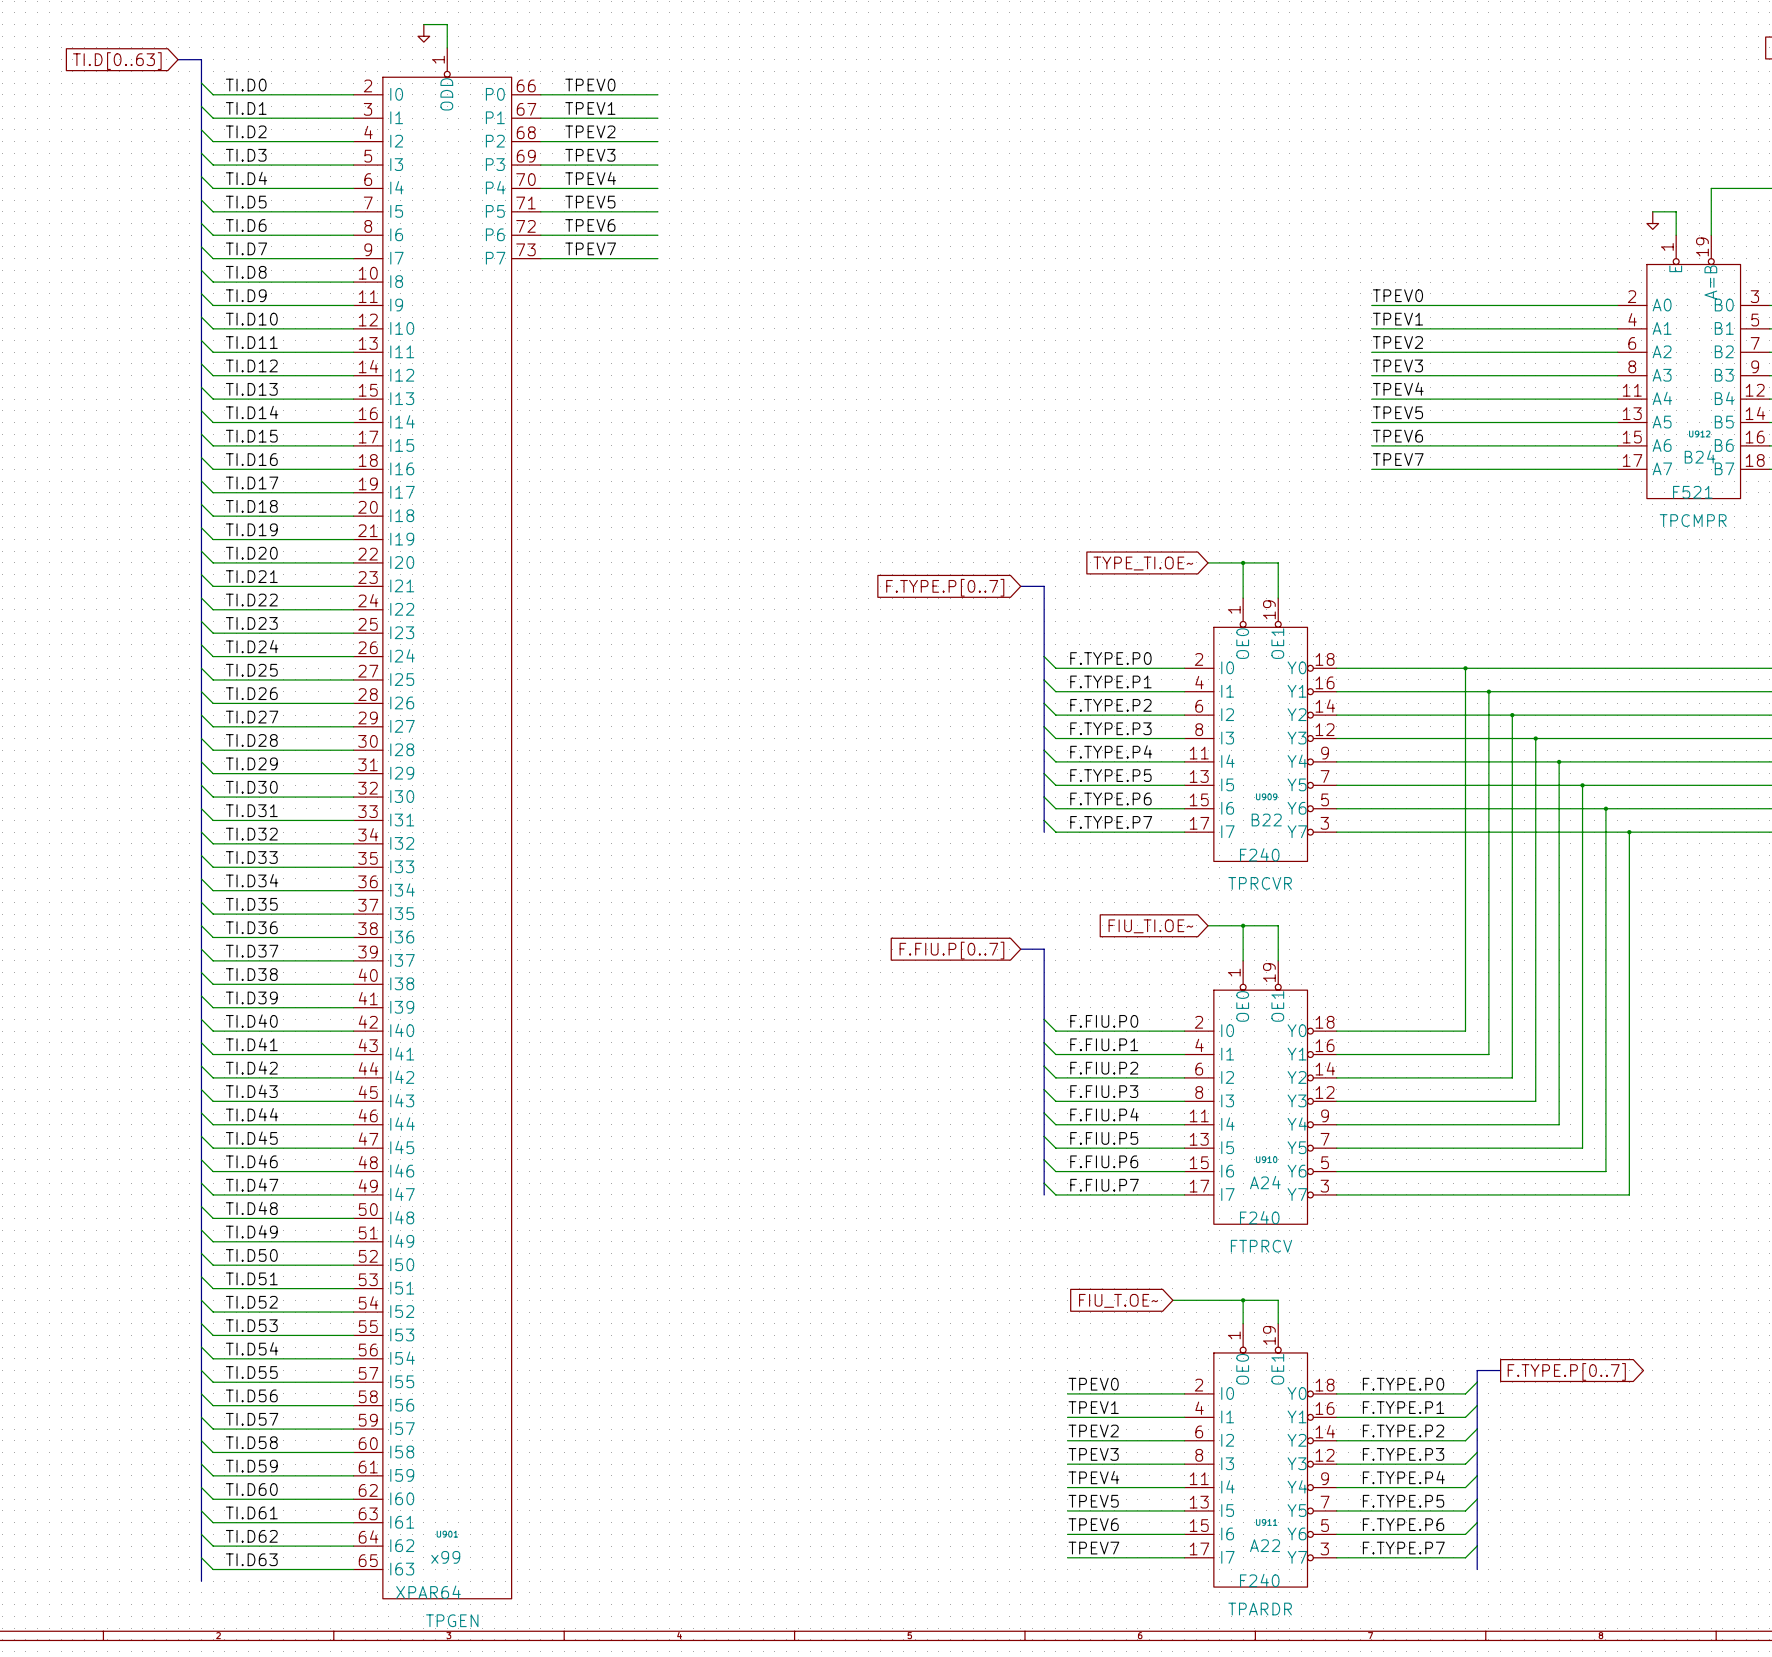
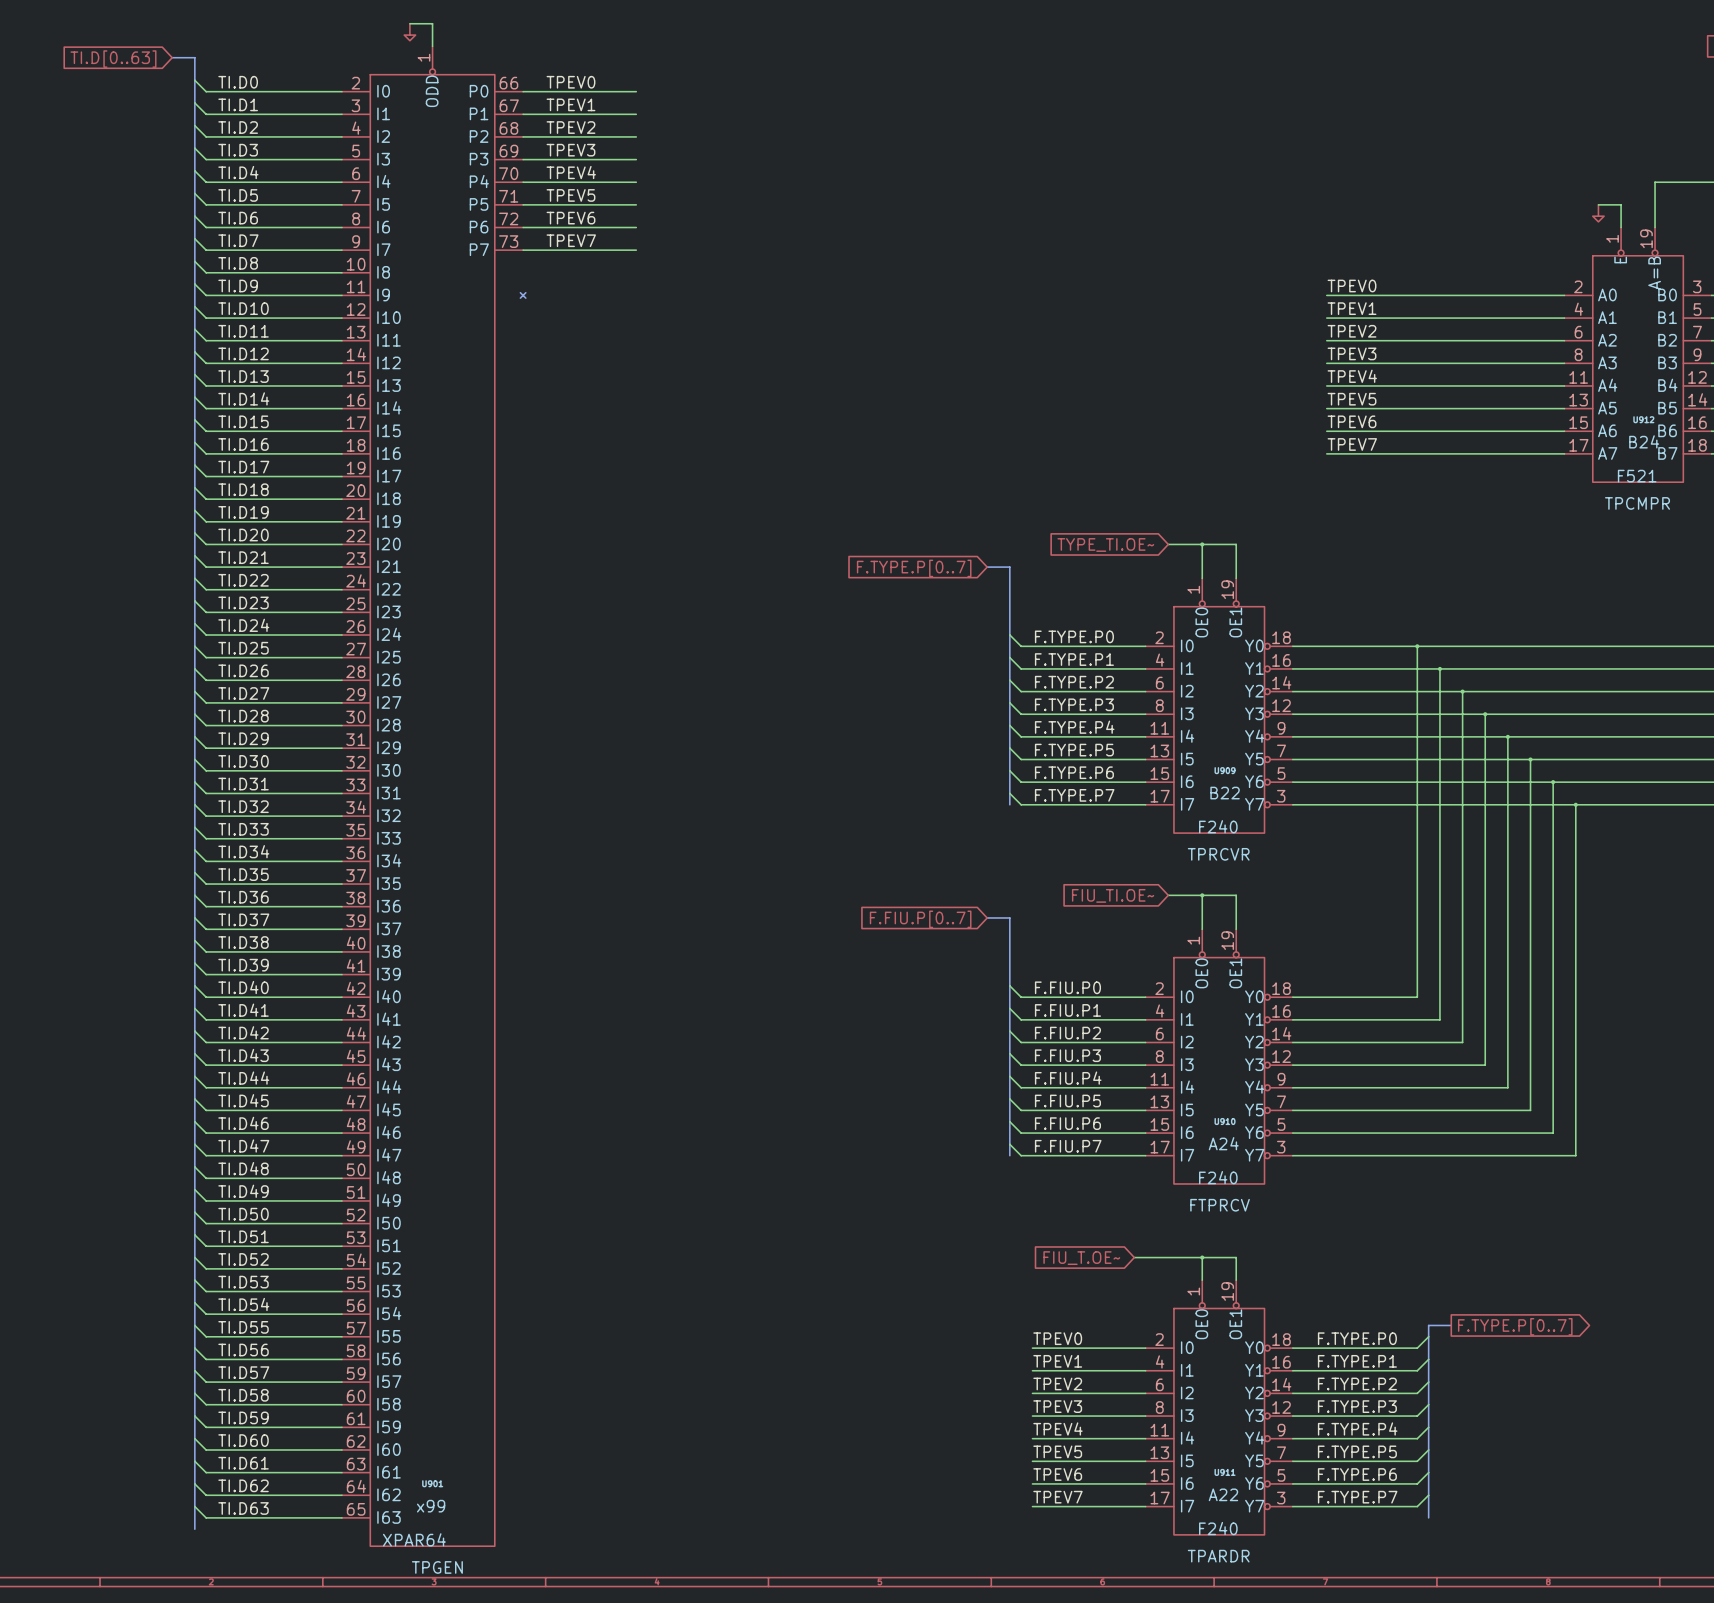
no-connect mark: none -> (523, 295)

